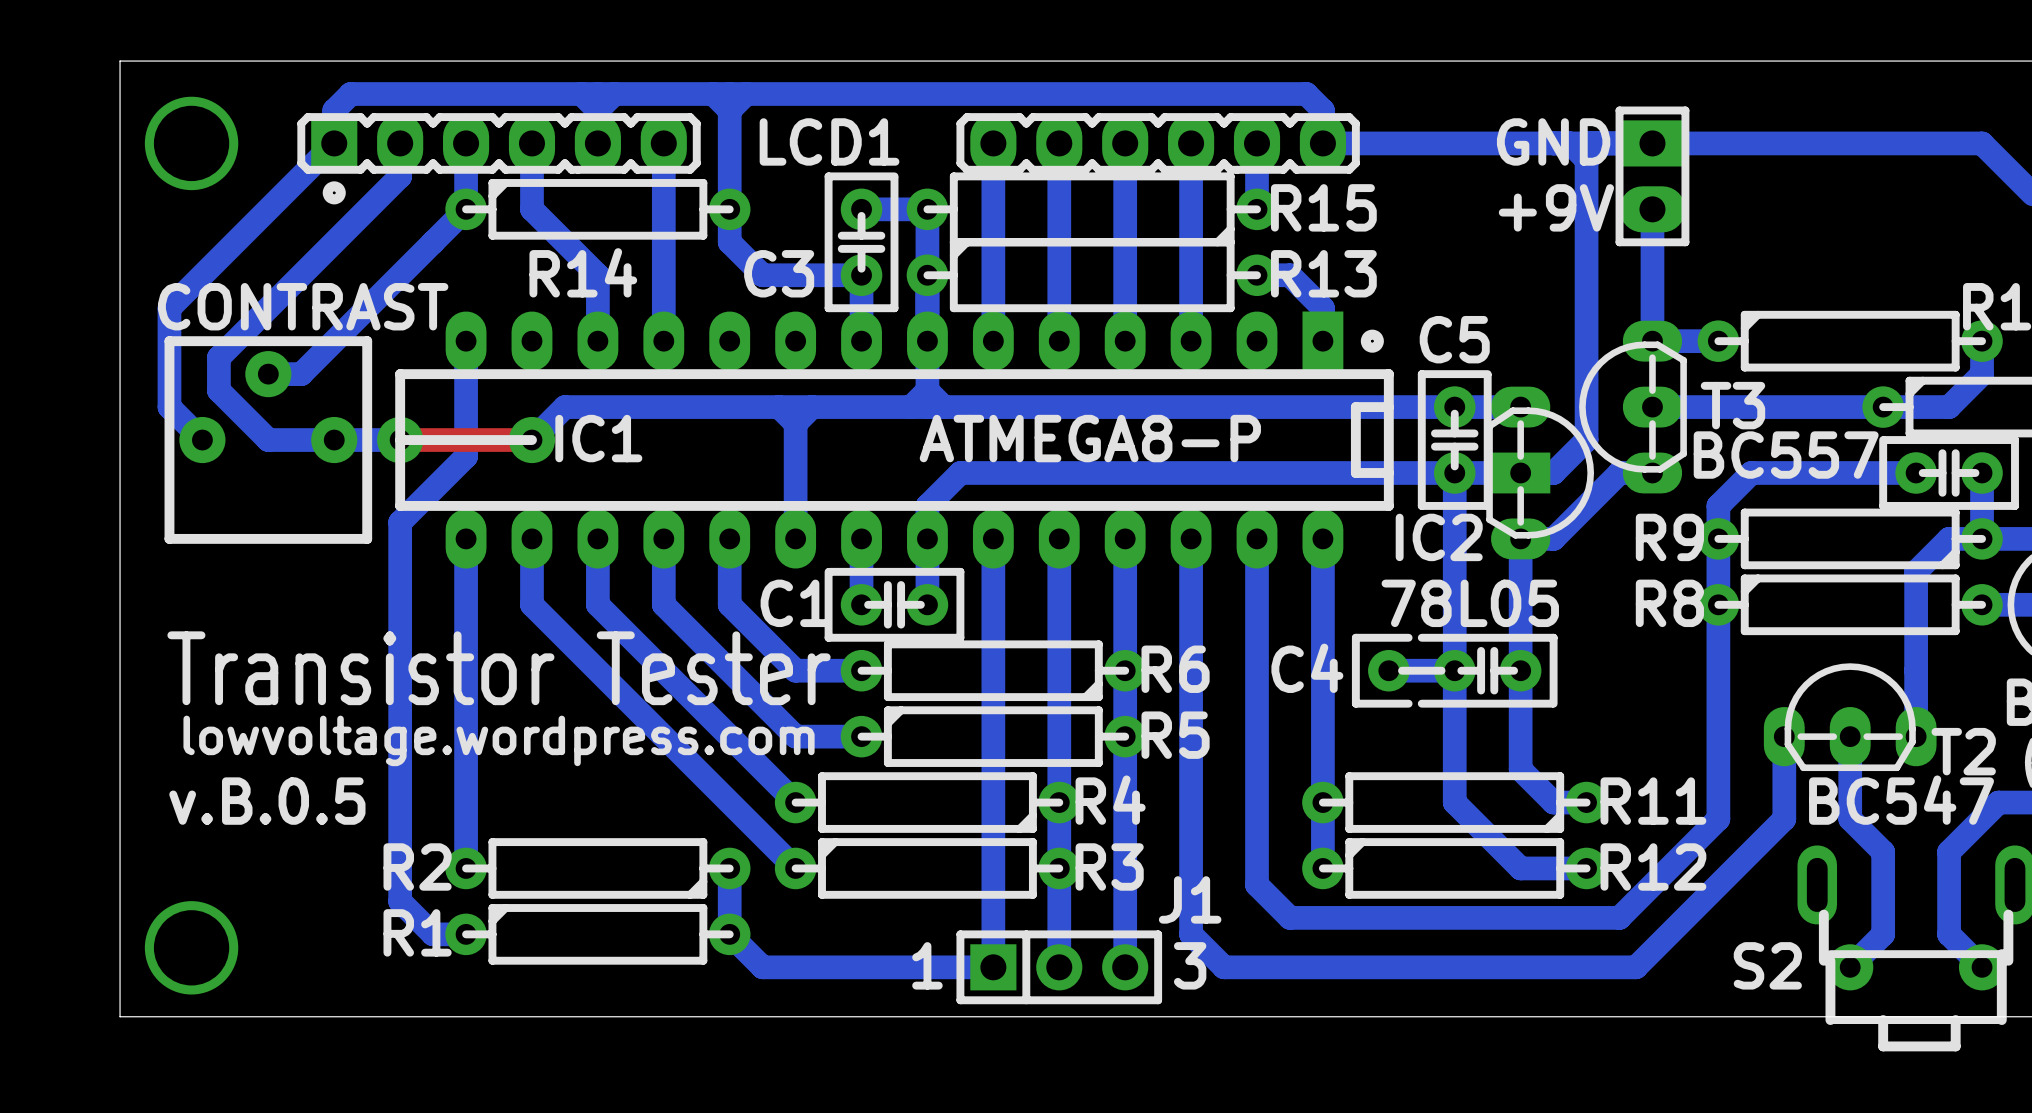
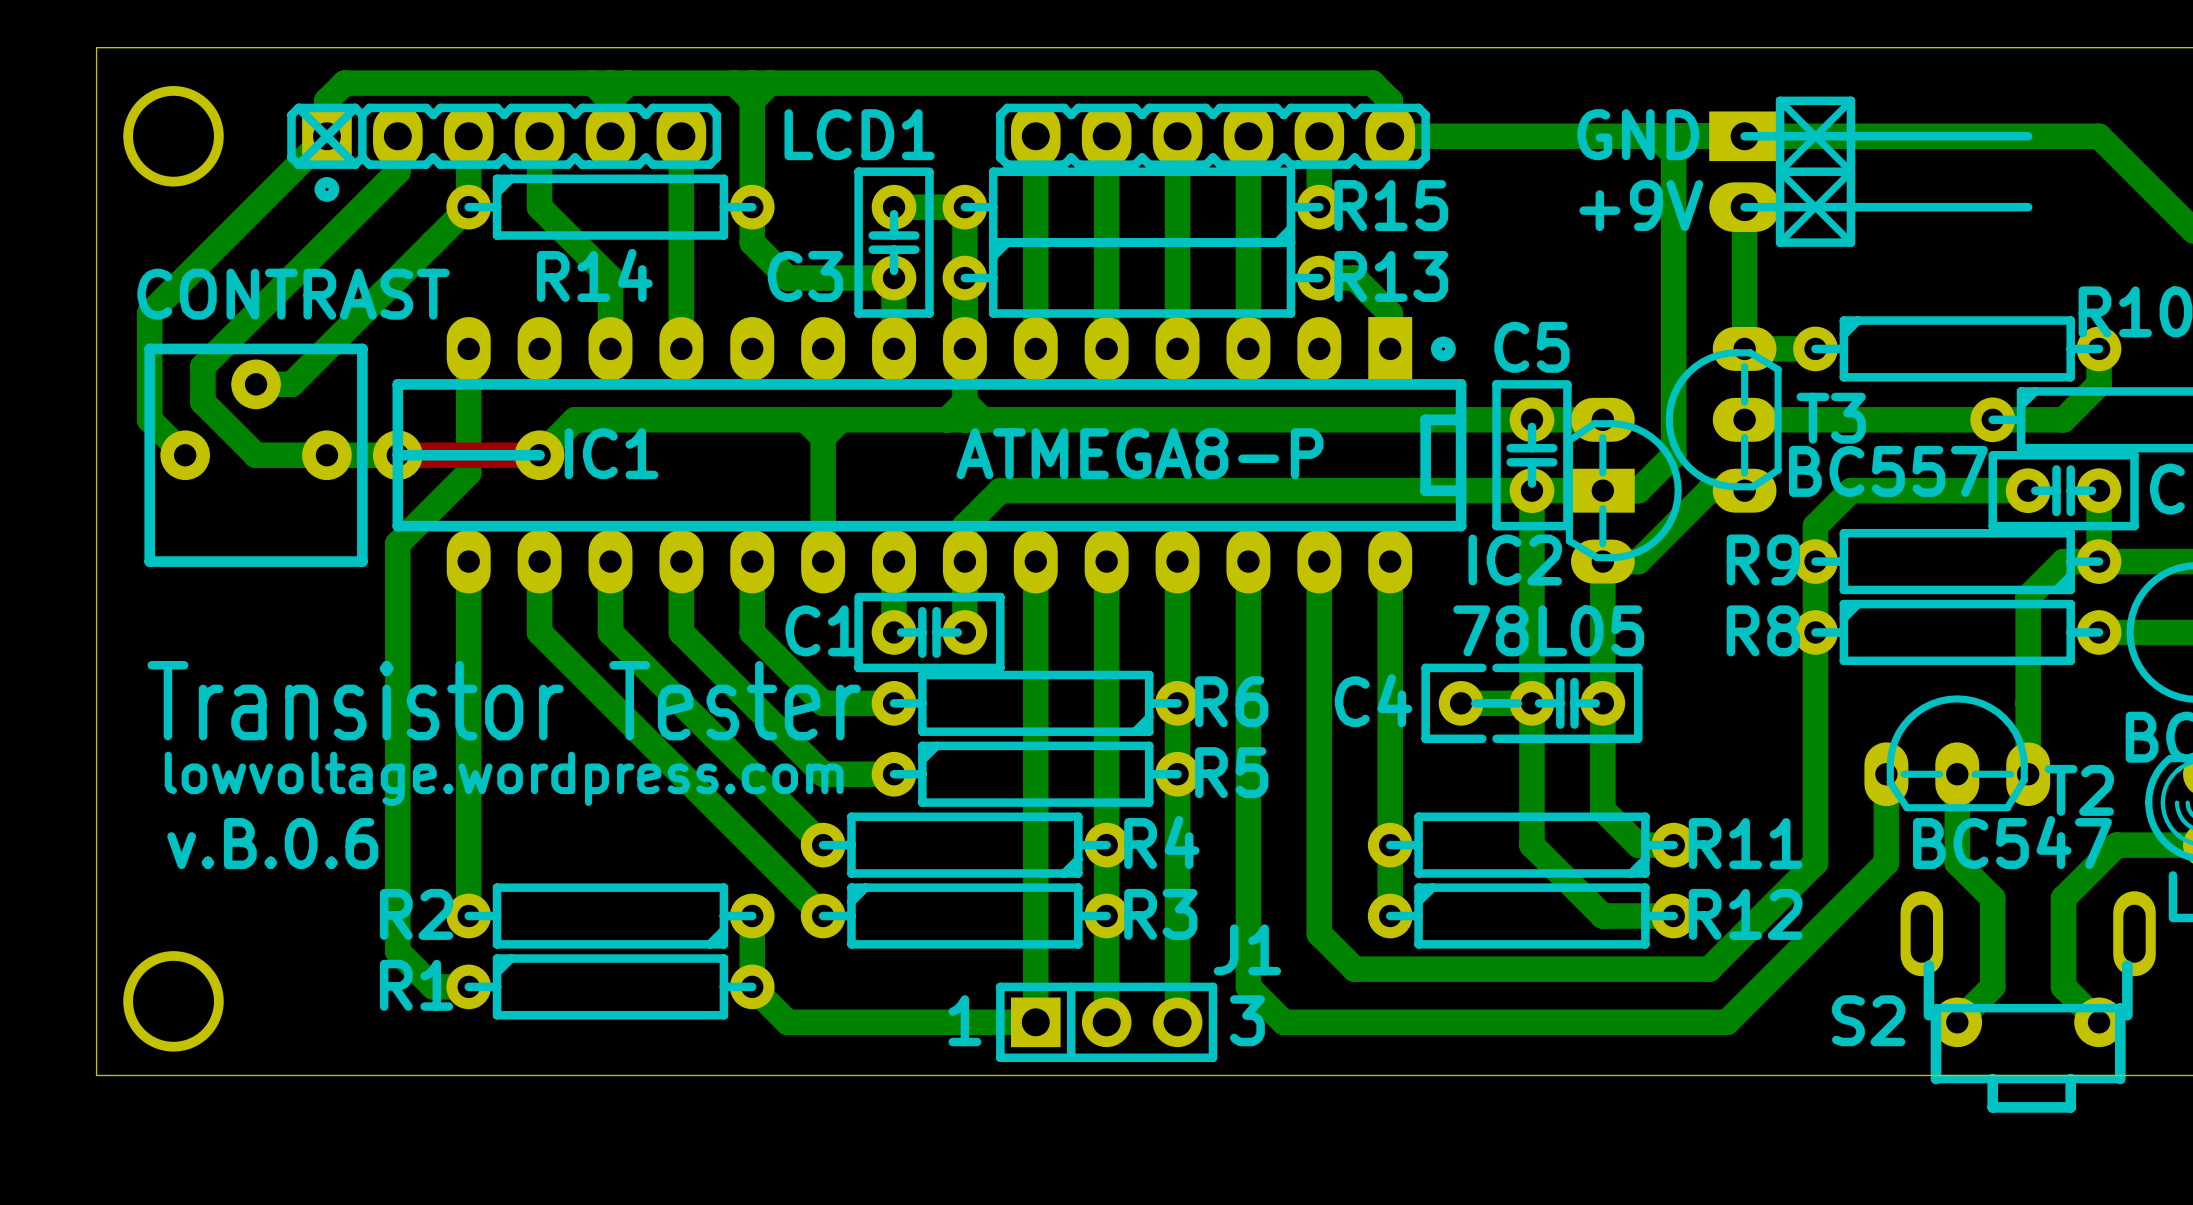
LCD1 footprint: [297, 113, 1360, 174] -> [287, 103, 1430, 202]
part: (1652, 176) -> none
part: none -> (1870, 171)
text position: CONTRAST (303, 306) -> CONTRAST (293, 294)
text: v.B.0.5 (267, 801) -> v.B.0.6 (272, 843)

